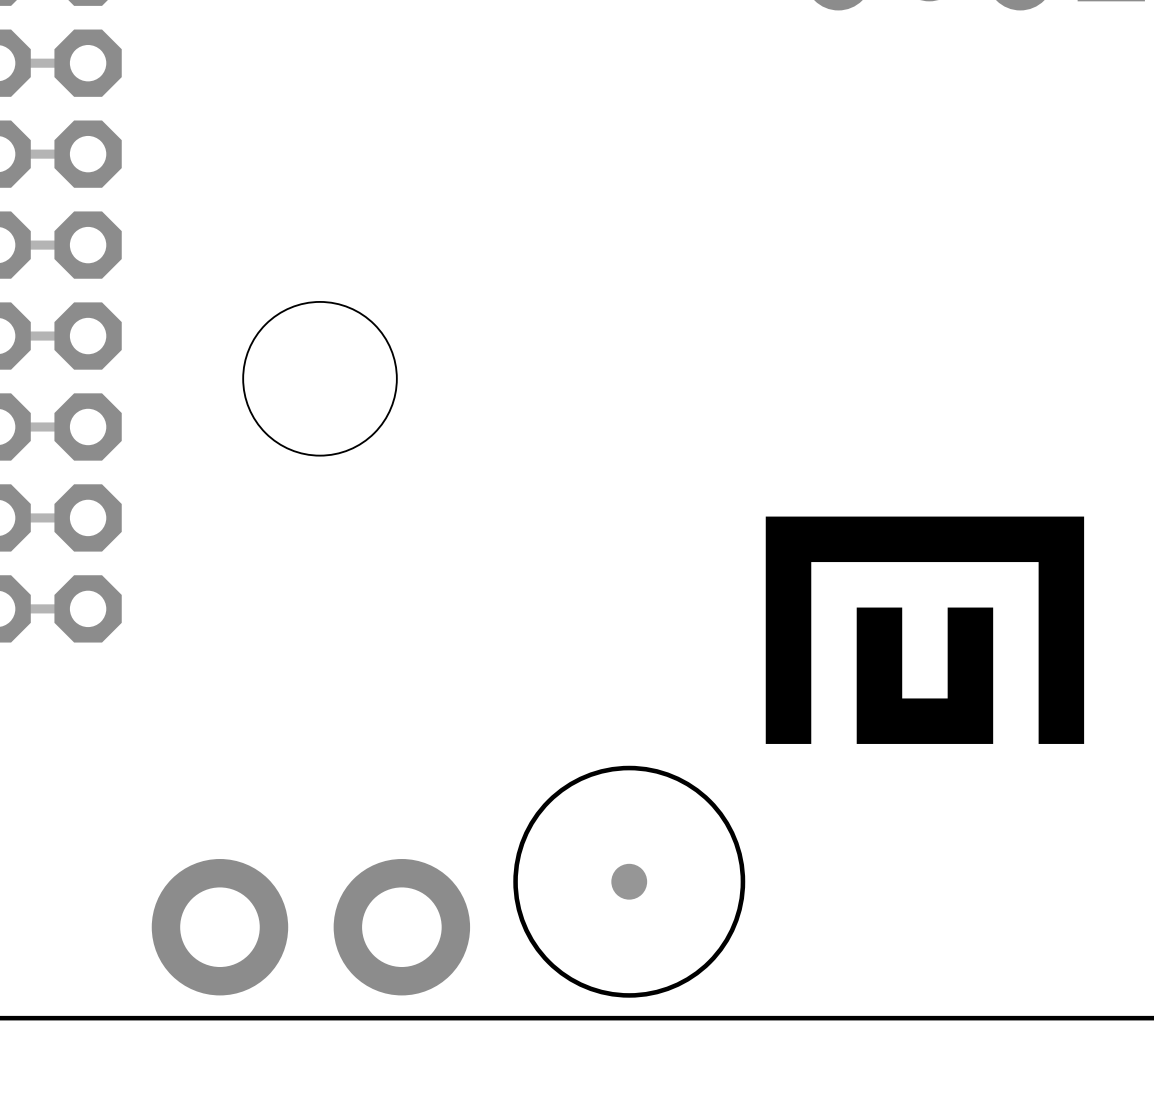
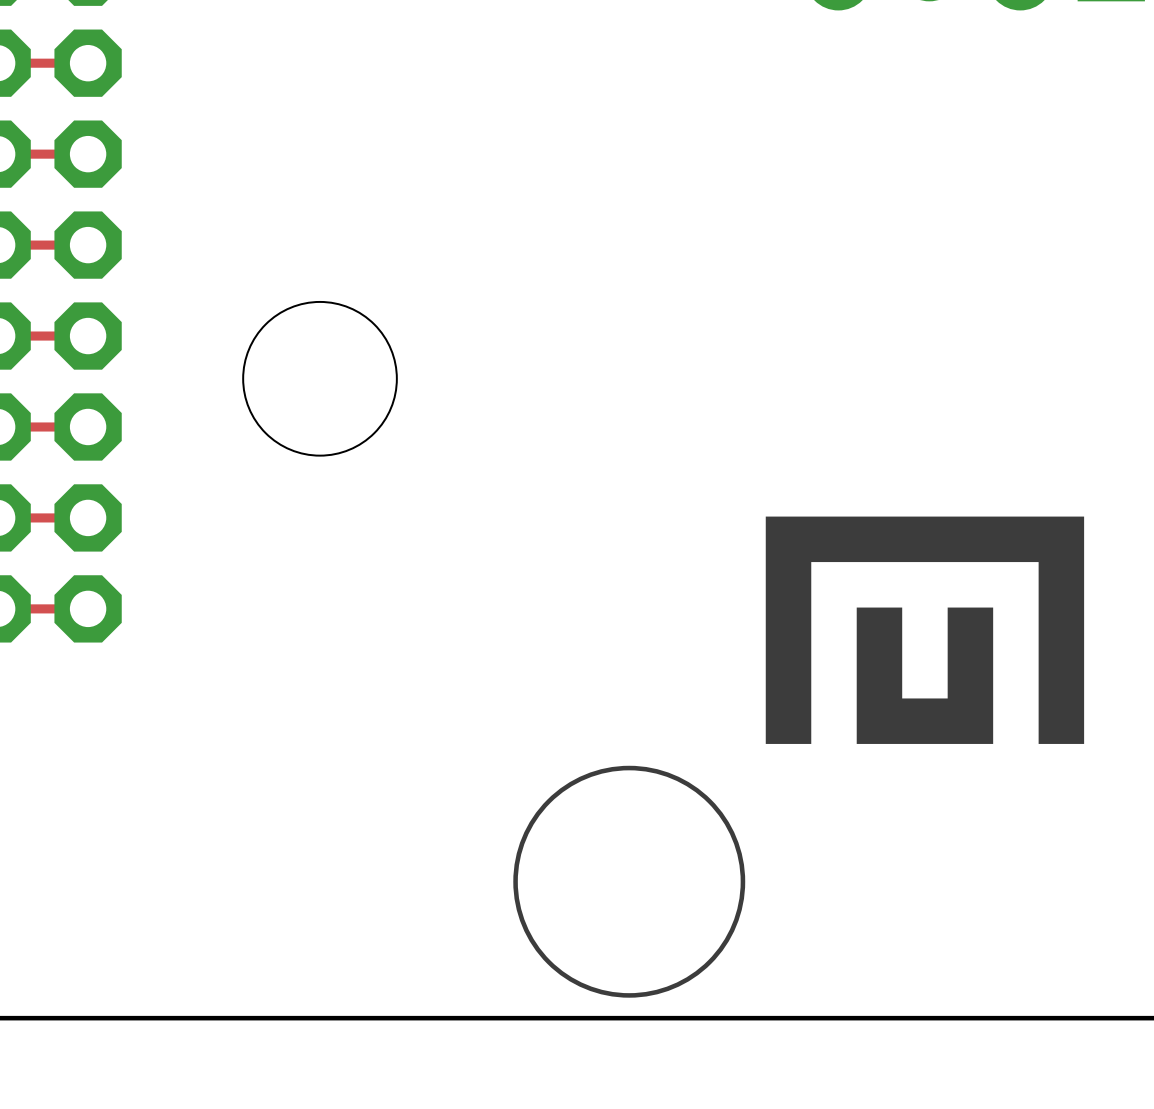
part: (629, 881) -> none
part: (219, 927) -> none
part: (401, 927) -> none

